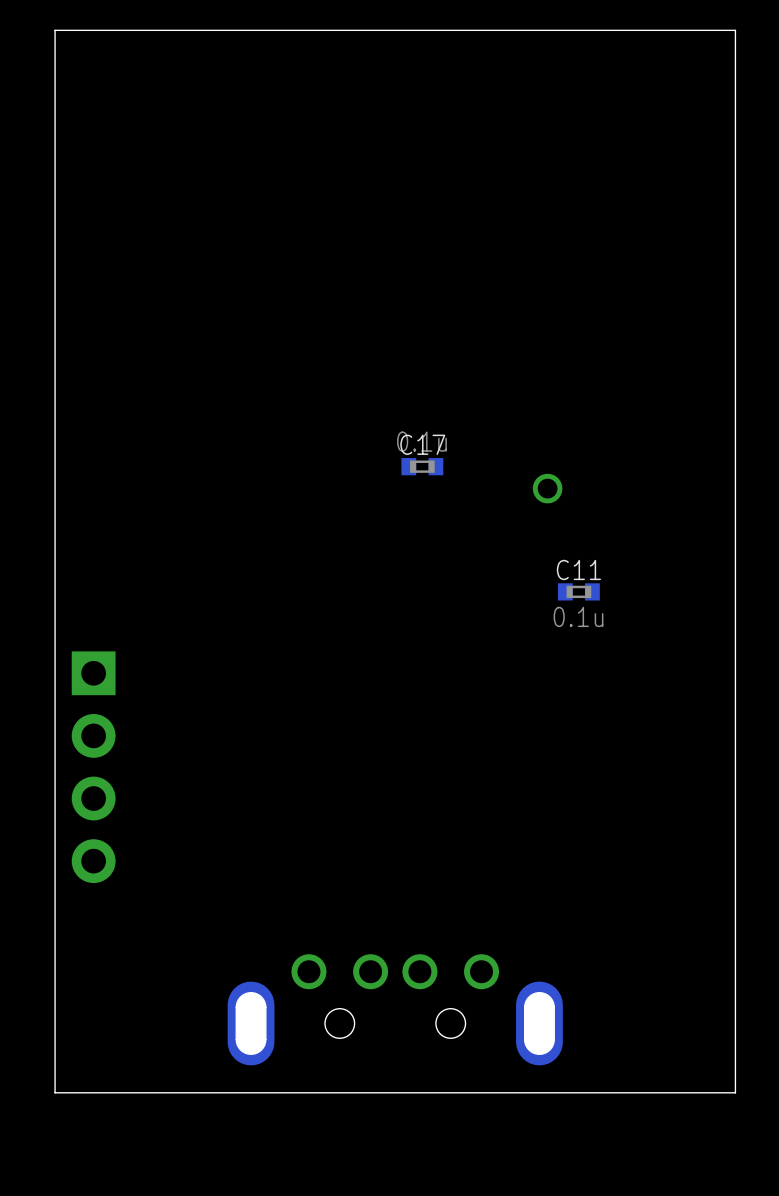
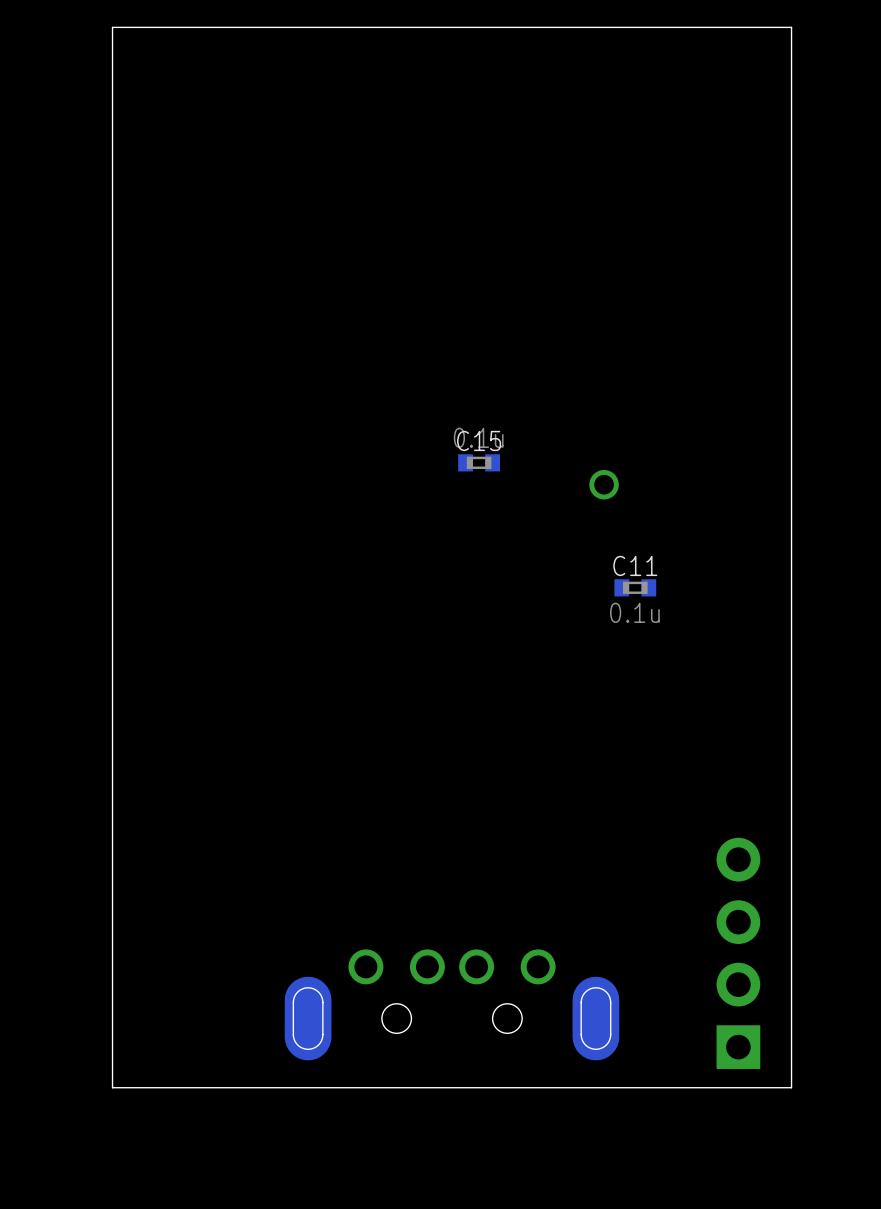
C17 name: C17 (422, 444) -> C15 (479, 440)
part: (93, 767) -> none
part footprint: [227, 954, 563, 1066] -> [284, 949, 620, 1061]
part: none -> (738, 953)

